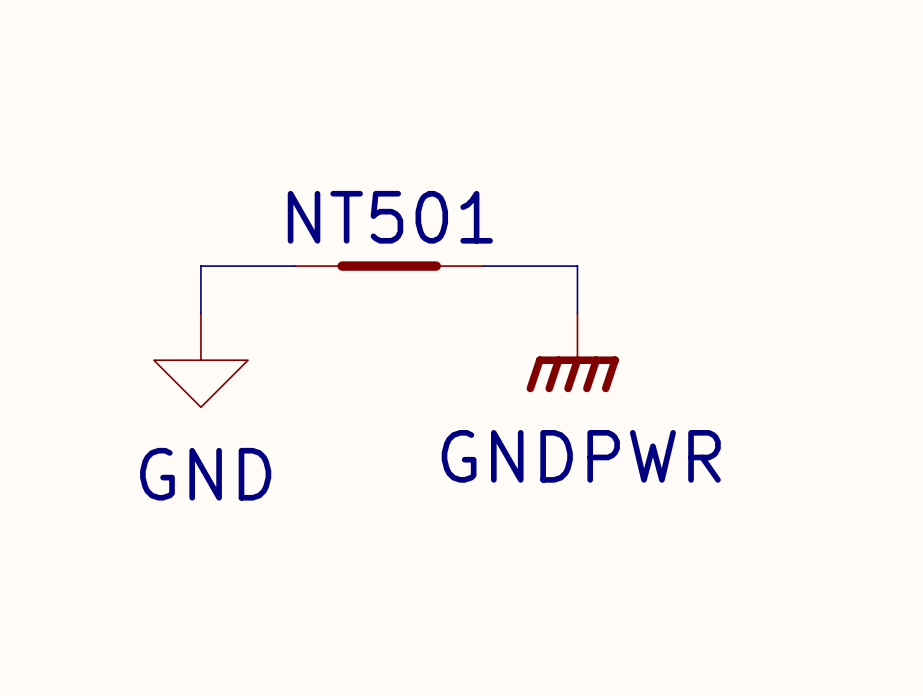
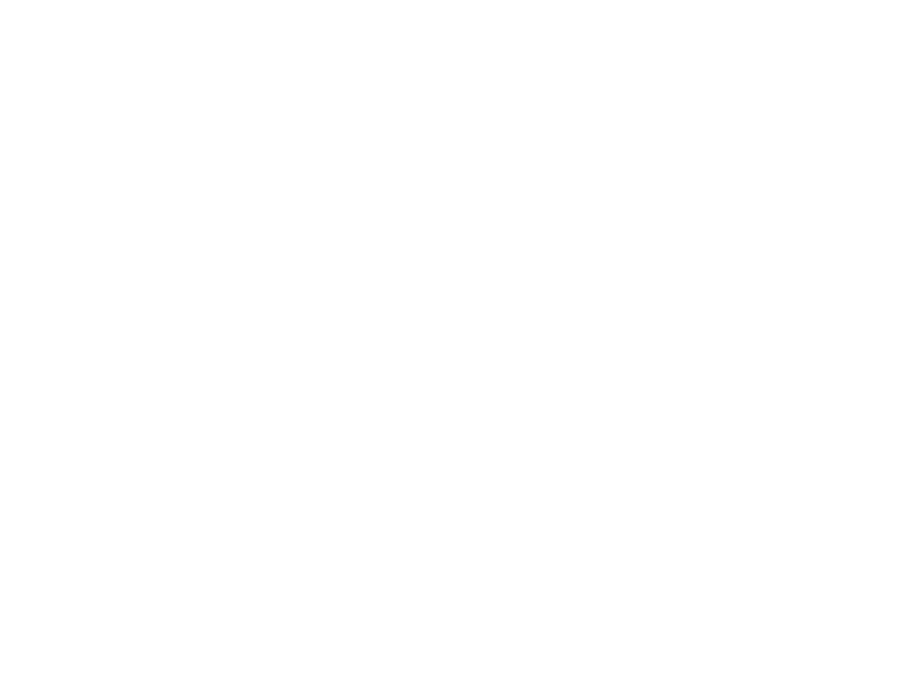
wire: (295, 266) (200, 266) (200, 313) -> none
NT501: (389, 266) -> none
wire: (483, 266) (577, 266) (577, 313) -> none
power symbol: GNDPWR (572, 352) -> none
power symbol: GND (200, 360) -> none

